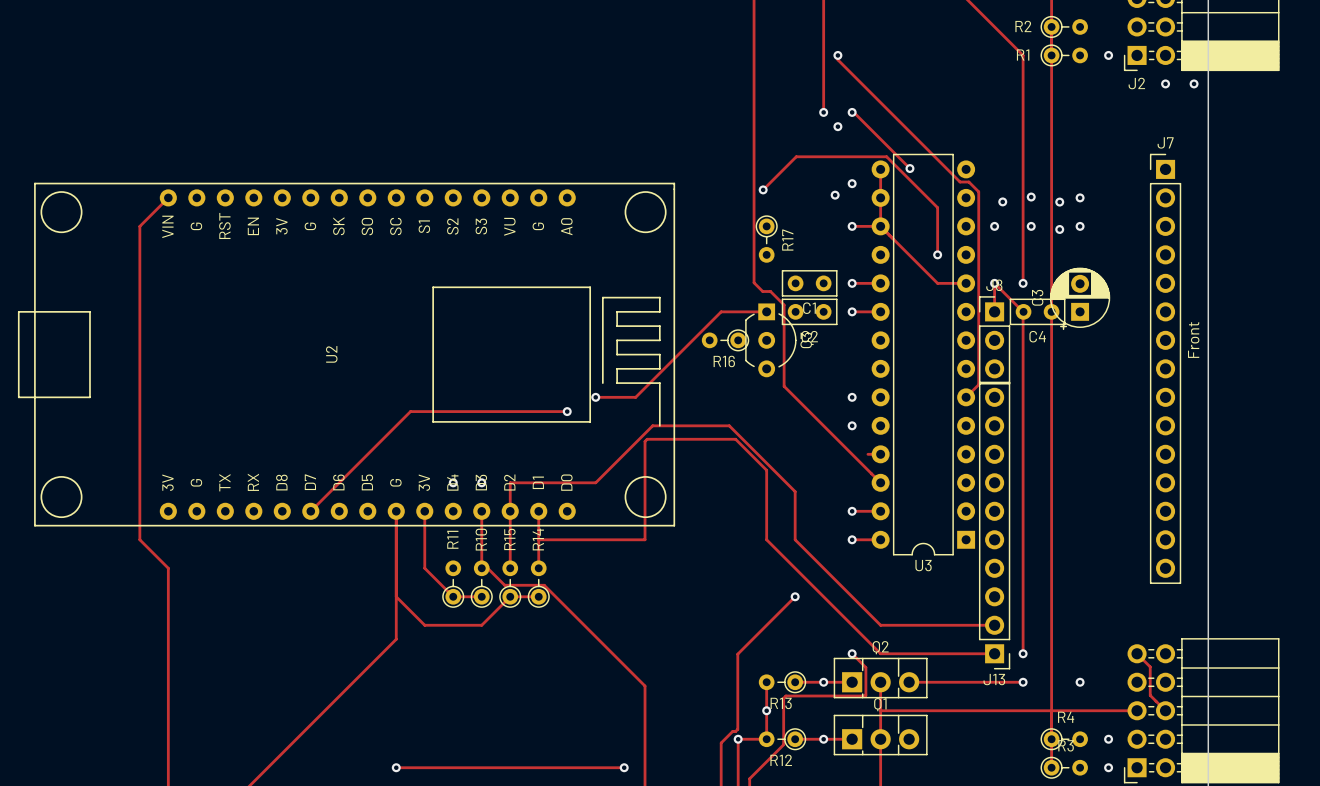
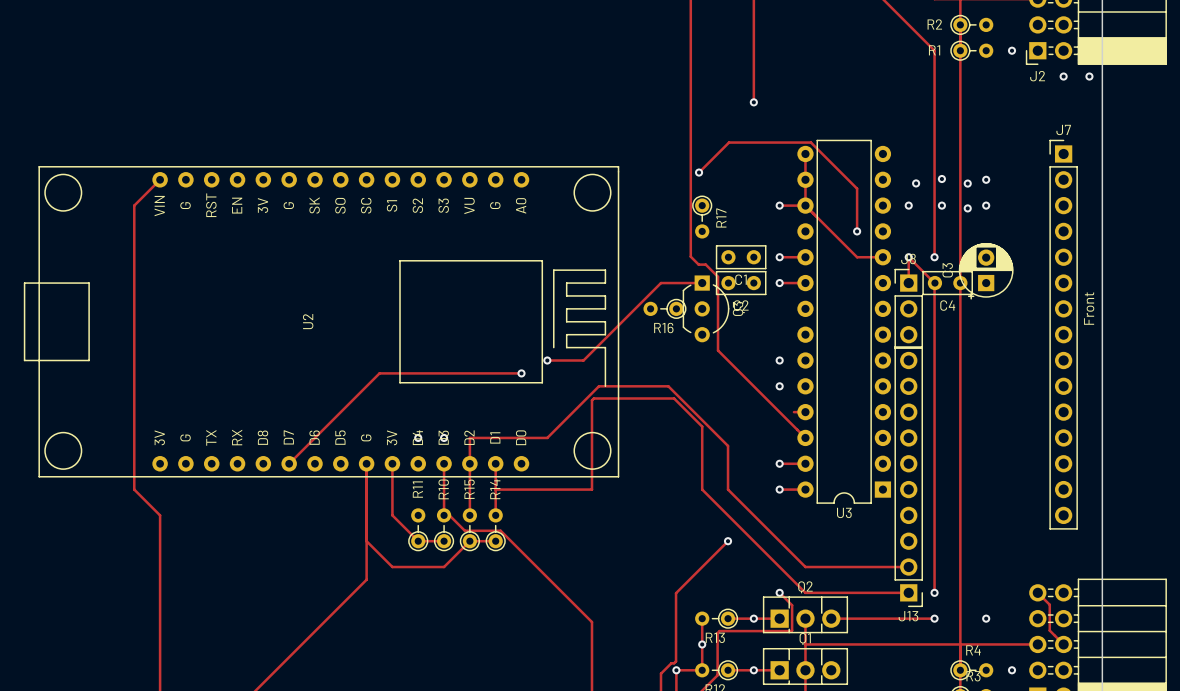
track: (837, 55) (837, 59) (960, 182) (968, 182) (978, 191) (978, 384) (966, 397) -> none
via: (837, 55) -> none
track: (852, 112) (909, 168) -> none
via: (852, 112) -> none
via: (837, 126) -> none
via: (909, 168) -> none
via: (852, 183) -> none
via: (835, 195) -> none

